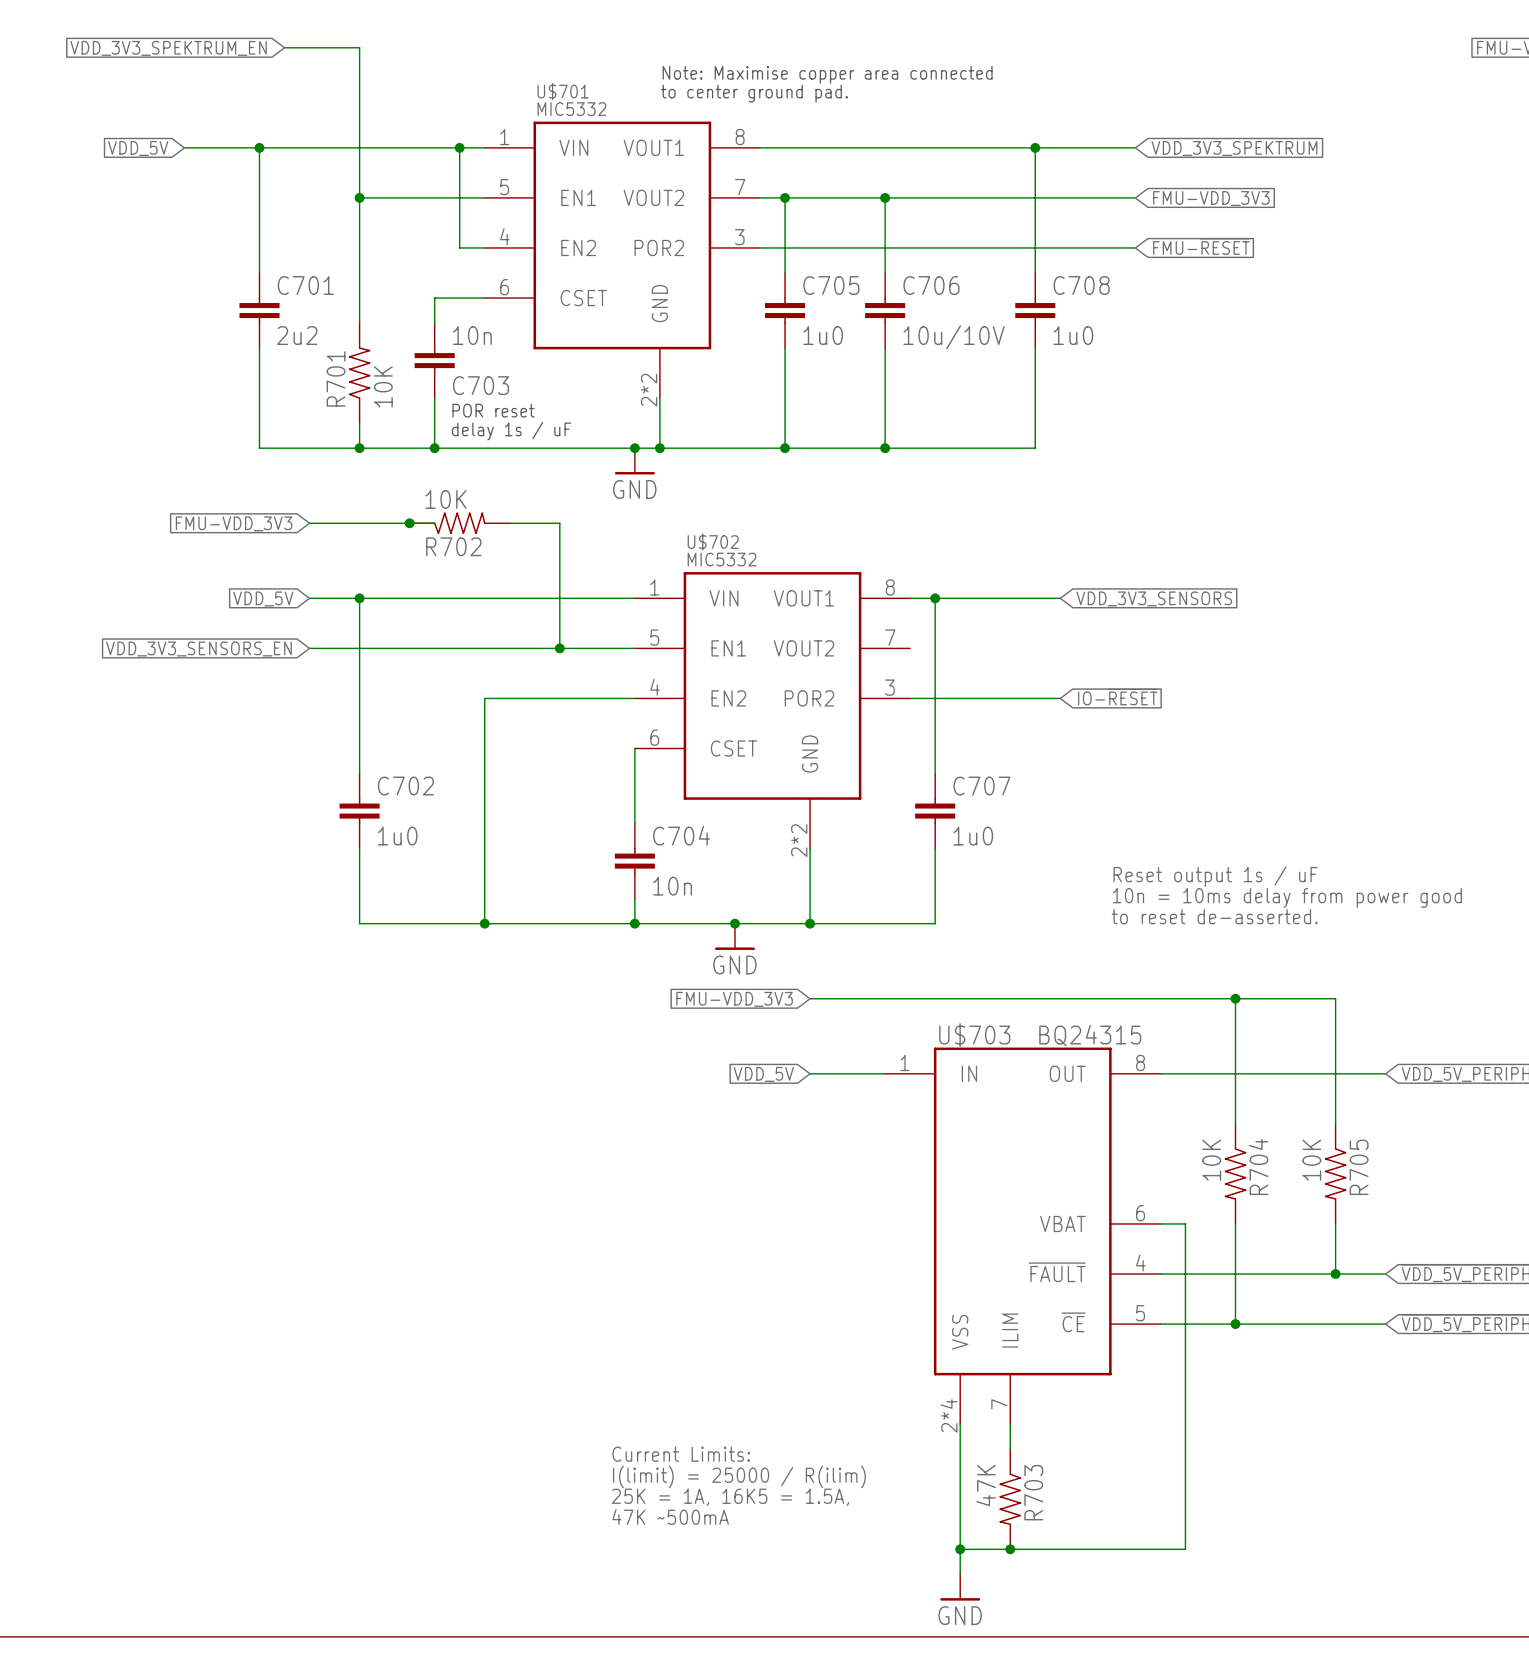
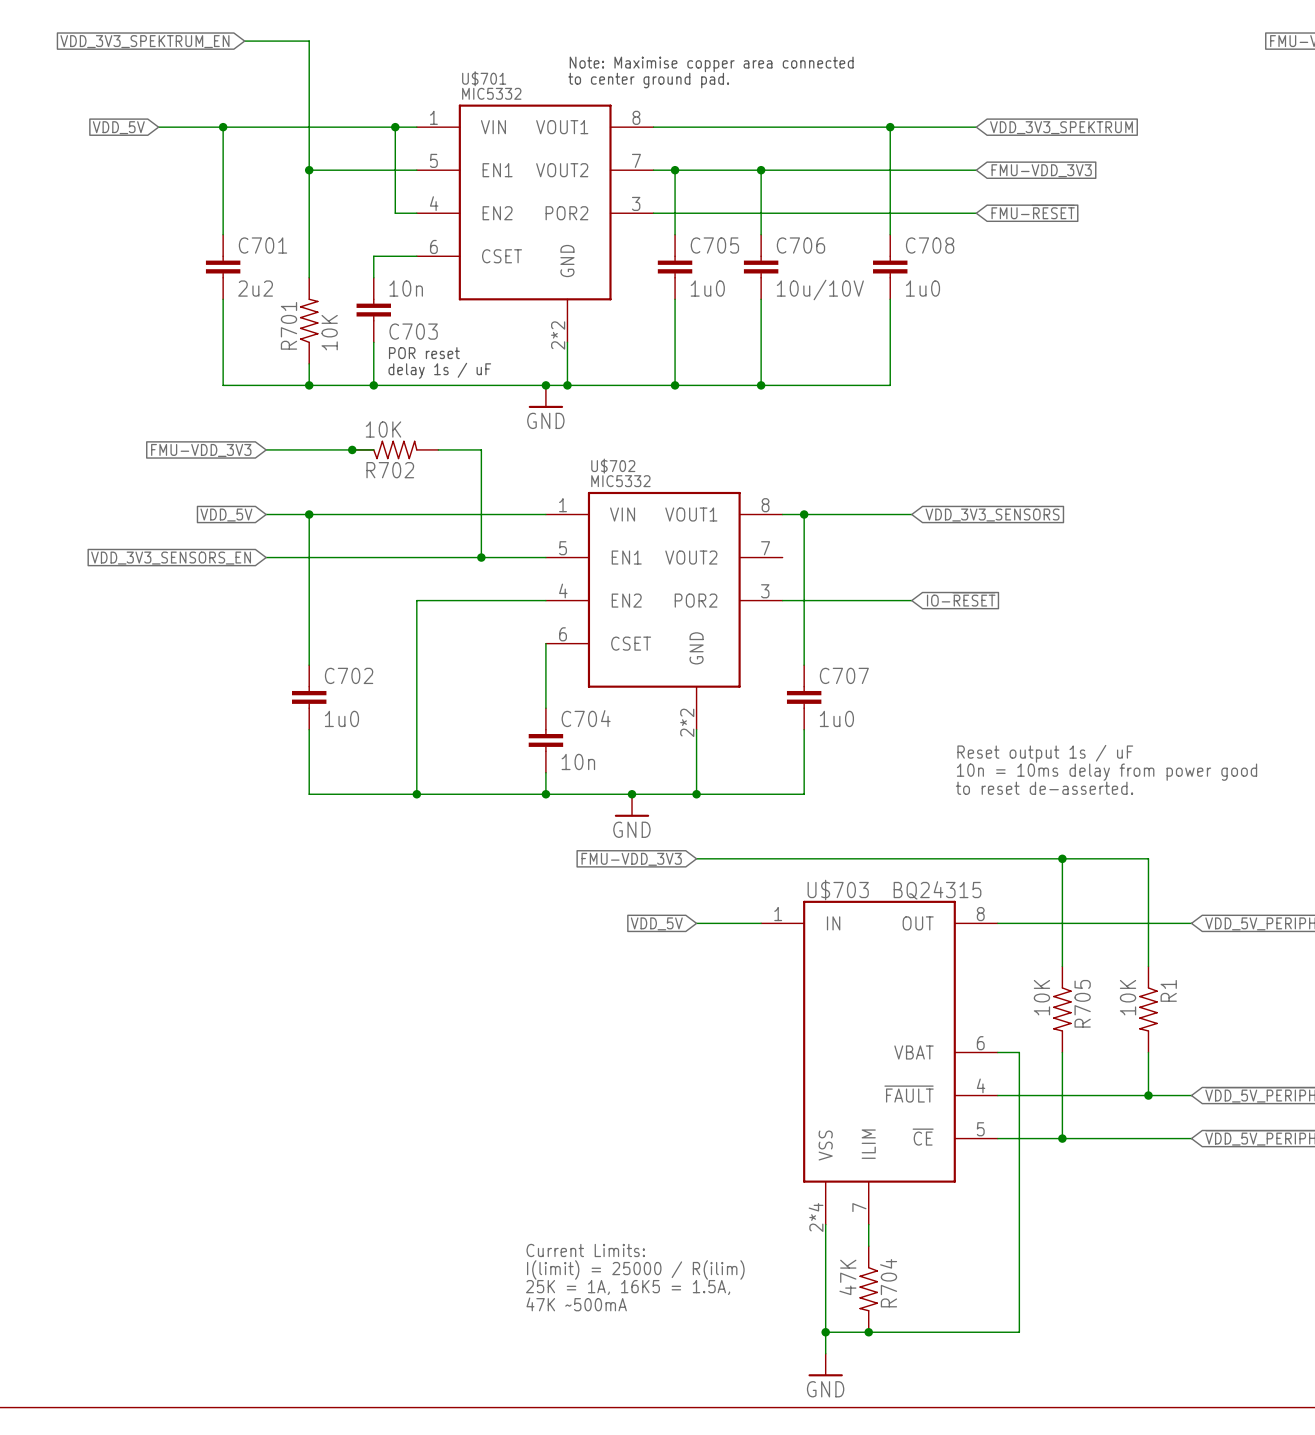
R704 name: R704 (1258, 1166) -> R705 (1082, 1003)
R705 name: R705 (1359, 1167) -> R1 (1168, 990)
R703 name: R703 (1033, 1492) -> R704 (888, 1283)

